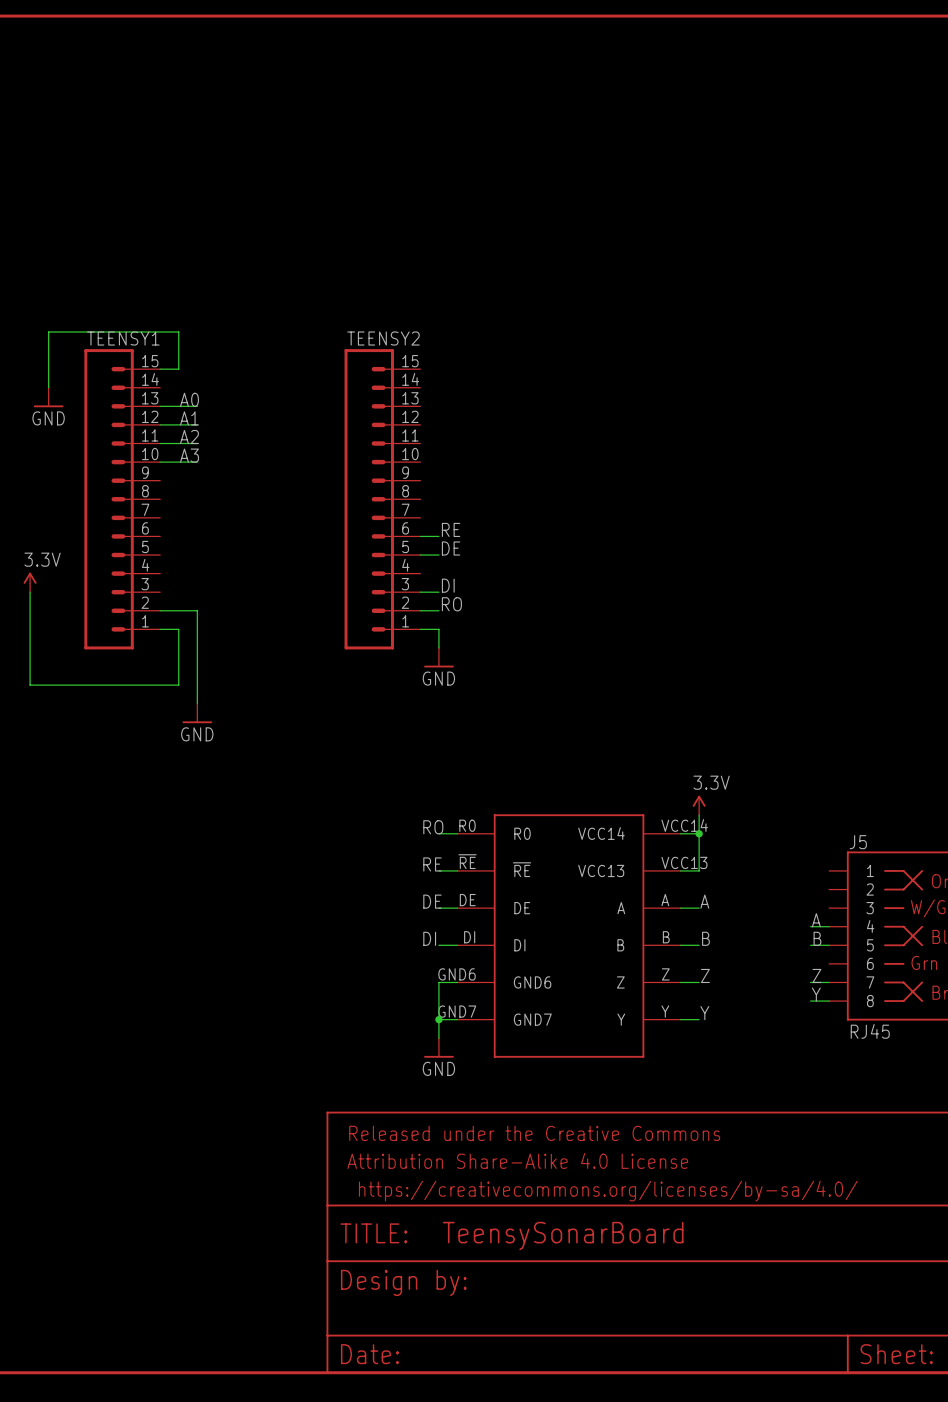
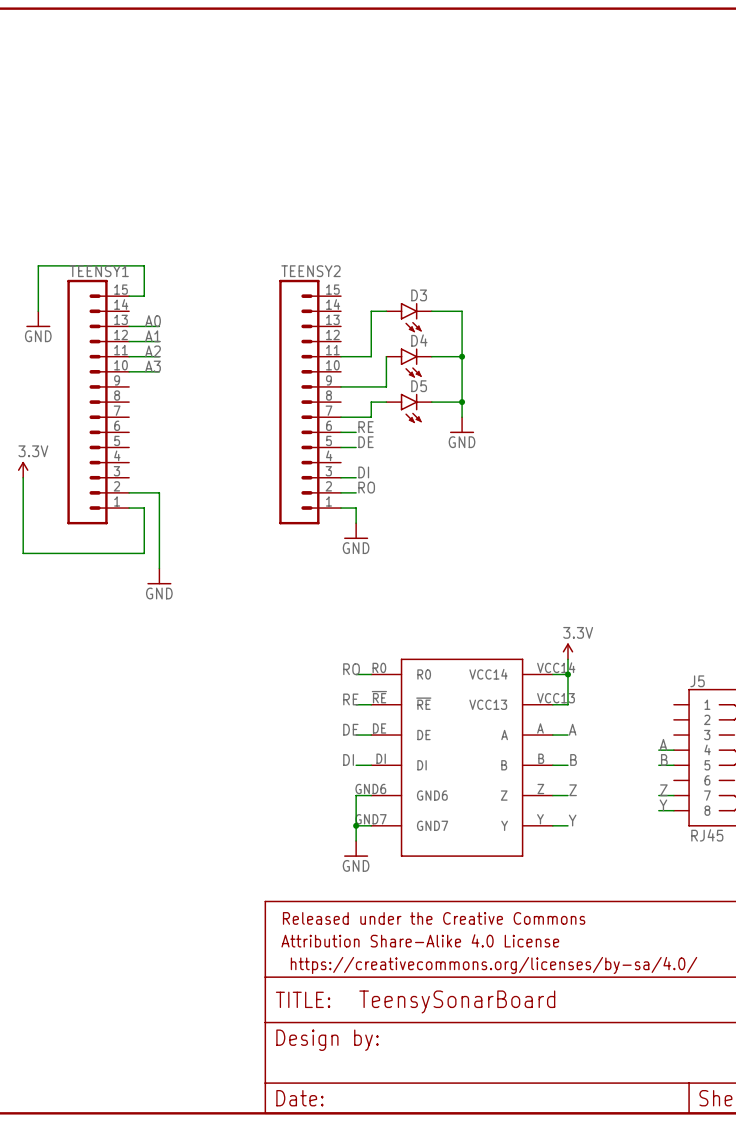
wire: none -> (386, 311) (371, 311) (371, 356) (340, 356)
wire: none -> (431, 311) (462, 311) (462, 417)
D3: none -> (409, 317)
wire: none -> (386, 356) (386, 386) (340, 386)
wire: none -> (431, 356) (462, 356)
junction: none -> (462, 356)
D4: none -> (409, 362)
wire: none -> (386, 402) (371, 402) (371, 417) (340, 417)
wire: none -> (431, 402) (462, 402)
junction: none -> (462, 402)
D5: none -> (409, 408)
power symbol: none -> GND (462, 425)

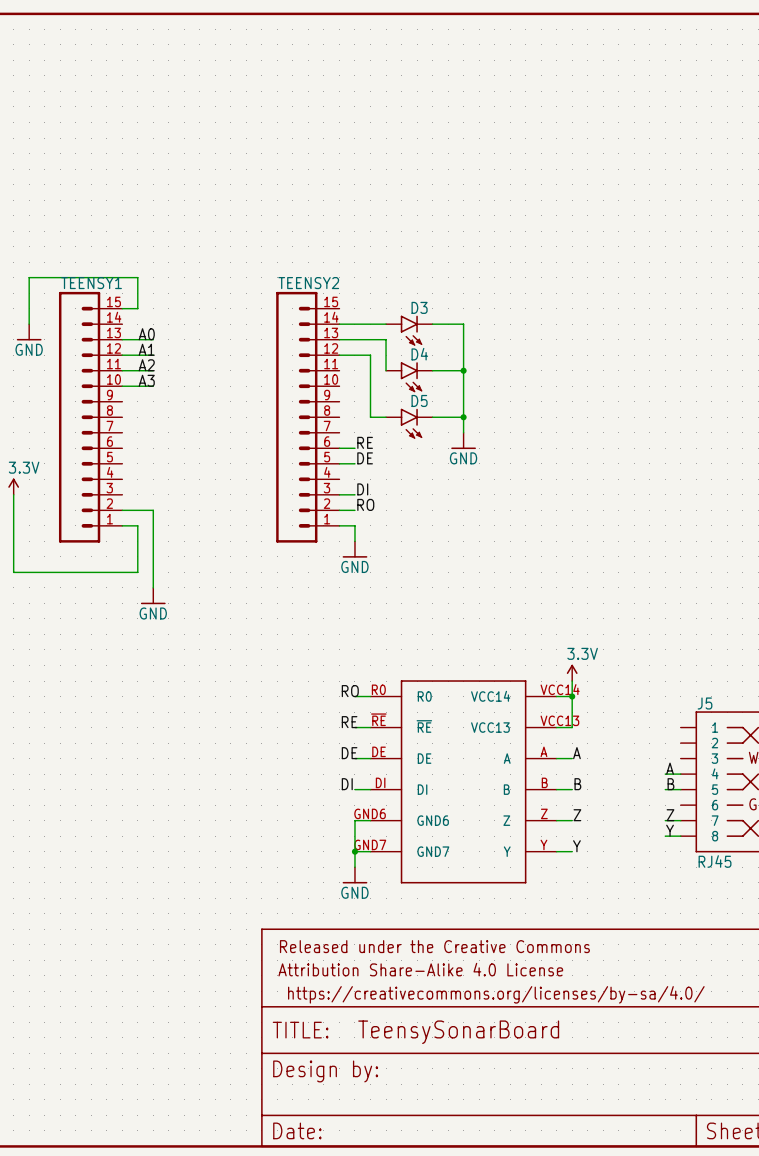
wire: (371, 311) (371, 341) -> (370, 324) (339, 324)
wire: none -> (339, 355) (370, 355)
wire: (340, 356) (371, 356) -> (370, 417) (370, 370)
wire: (386, 356) (386, 386) (340, 386) -> (386, 370) (386, 339) (339, 339)
wire: (371, 402) (371, 417) (340, 417) -> none

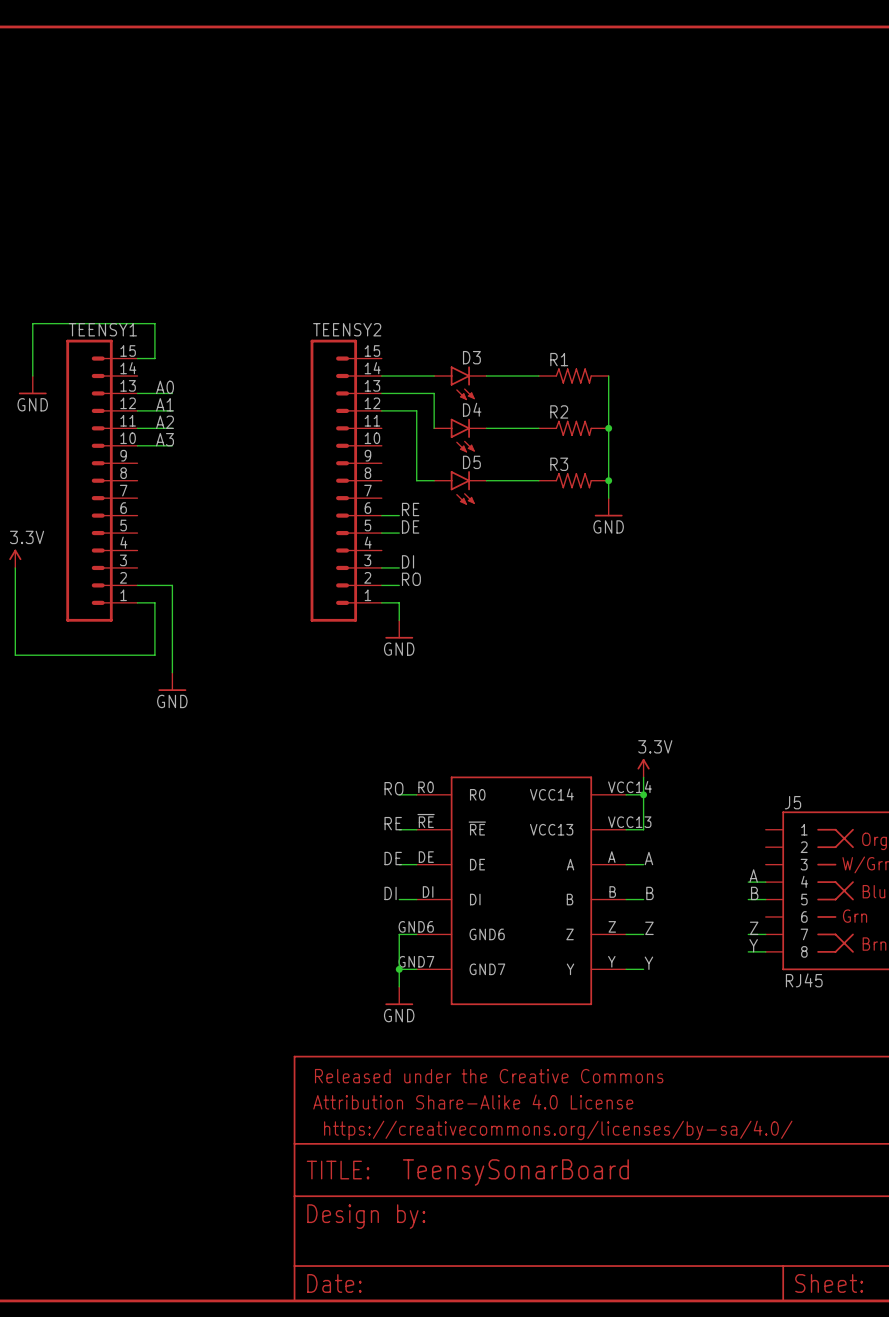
wire: (463, 324) (463, 432) -> (521, 375) (538, 375)
R1: none -> (573, 375)
wire: none -> (608, 375) (608, 498)
wire: none -> (521, 428) (538, 428)
junction: (463, 370) -> none
R2: none -> (573, 428)
junction: none -> (608, 428)
wire: none -> (521, 480) (538, 480)
junction: (463, 417) -> none
R3: none -> (573, 480)
junction: none -> (608, 480)
power symbol position: GND (463, 440) -> GND (608, 507)

